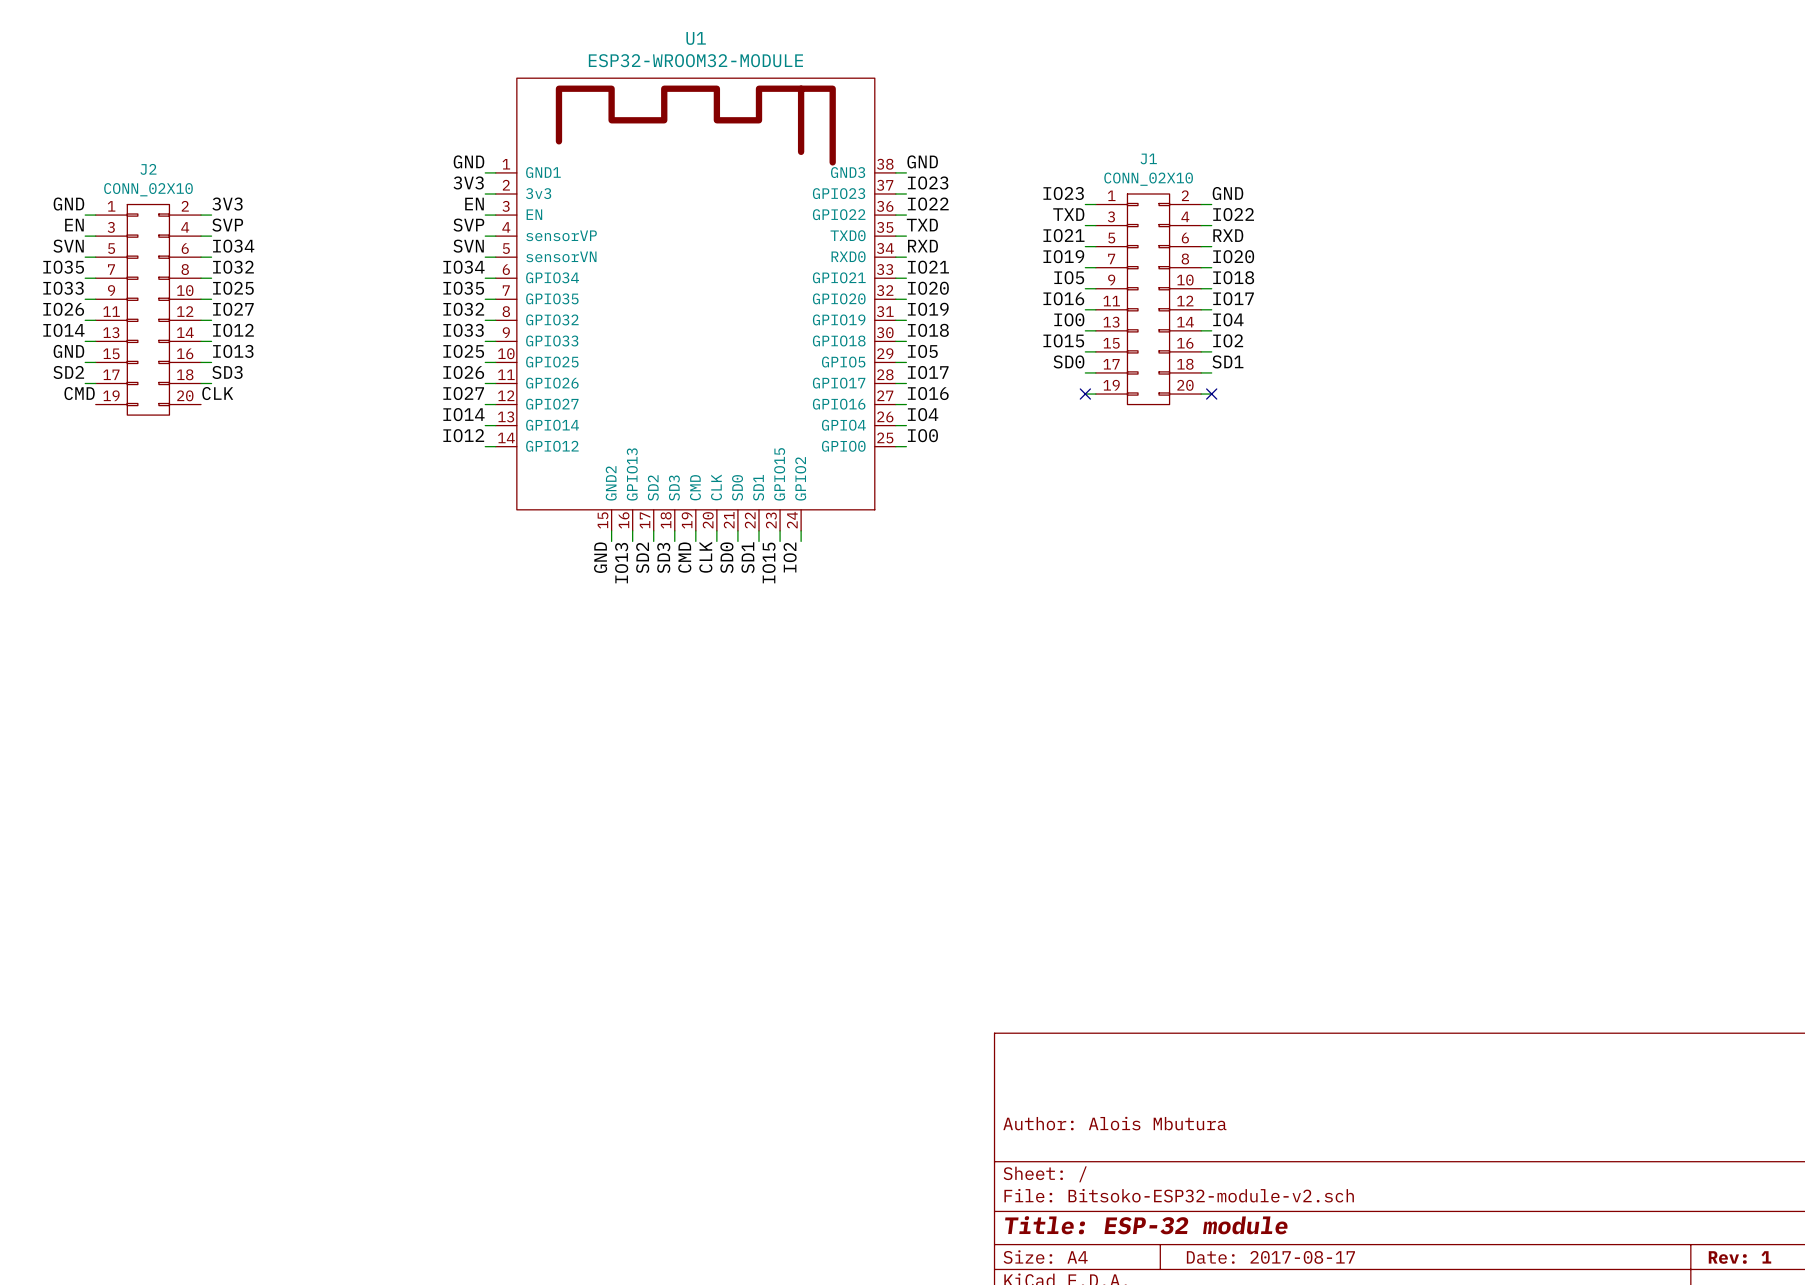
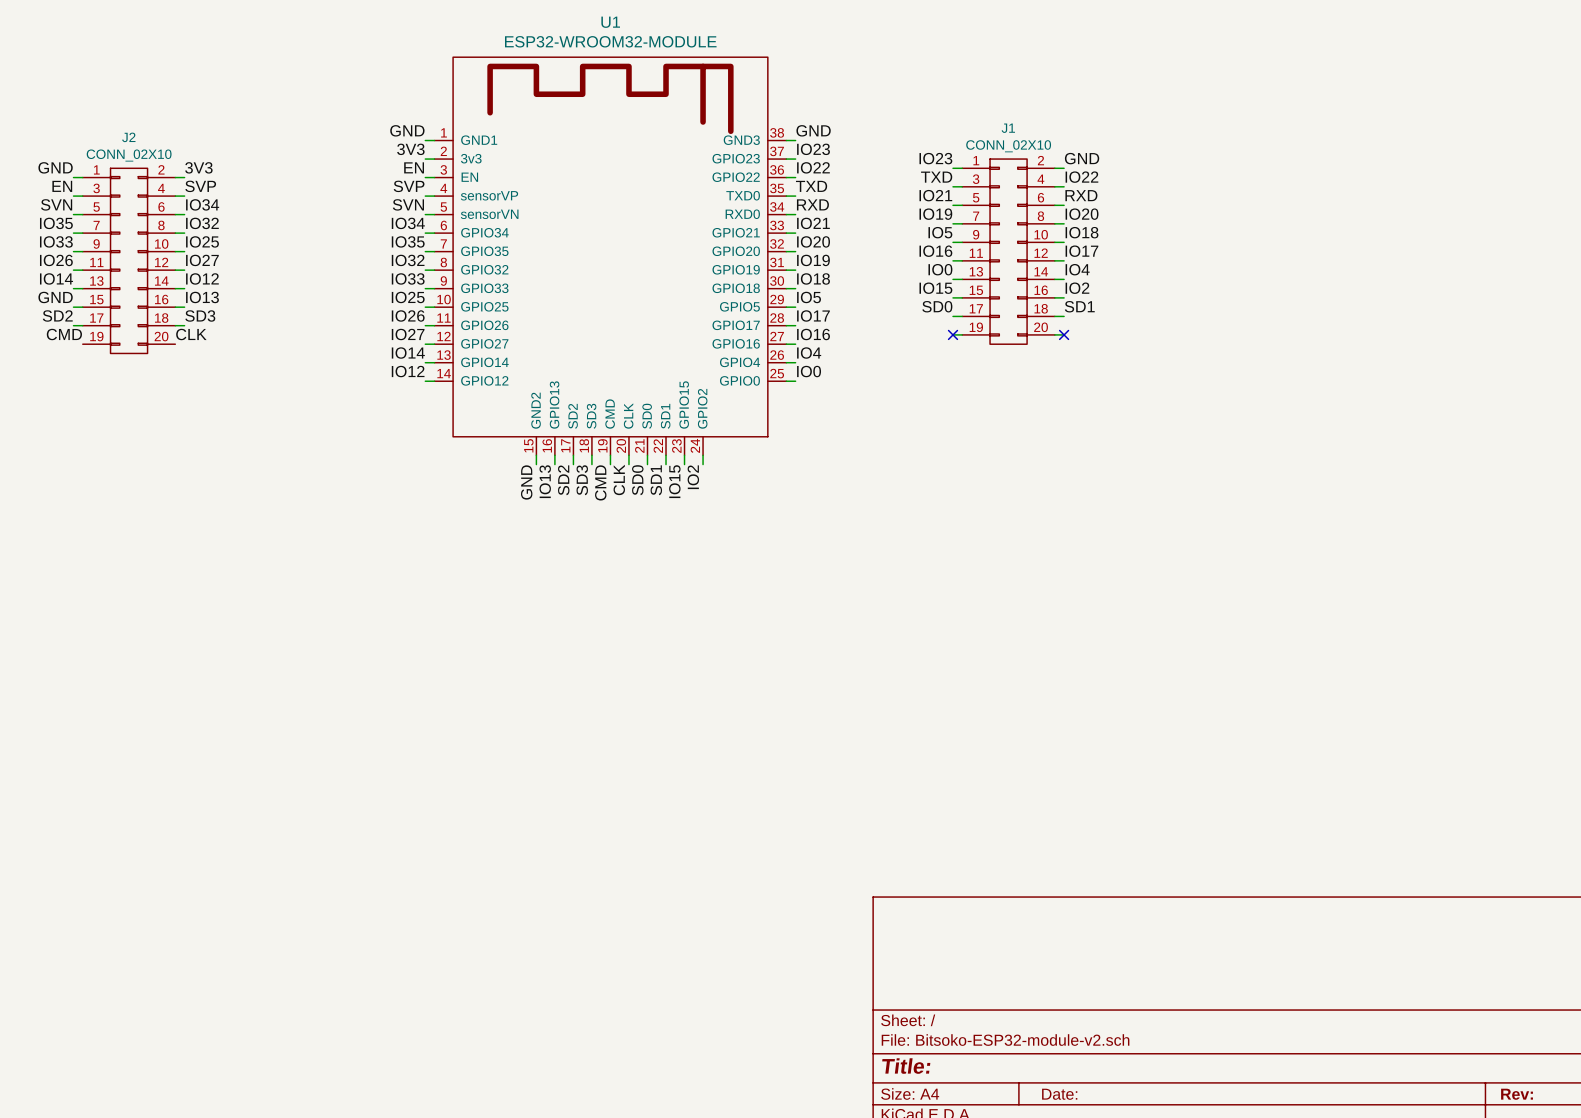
title block: Author: Alois Mbutura (1114, 1123) -> none
title block: Title: ESP-32 module (1146, 1225) -> Title: (906, 1066)
title block: Date: 2017-08-17 (1270, 1257) -> Date: (1059, 1094)
title block: Rev: 1 (1739, 1257) -> Rev: (1517, 1094)

